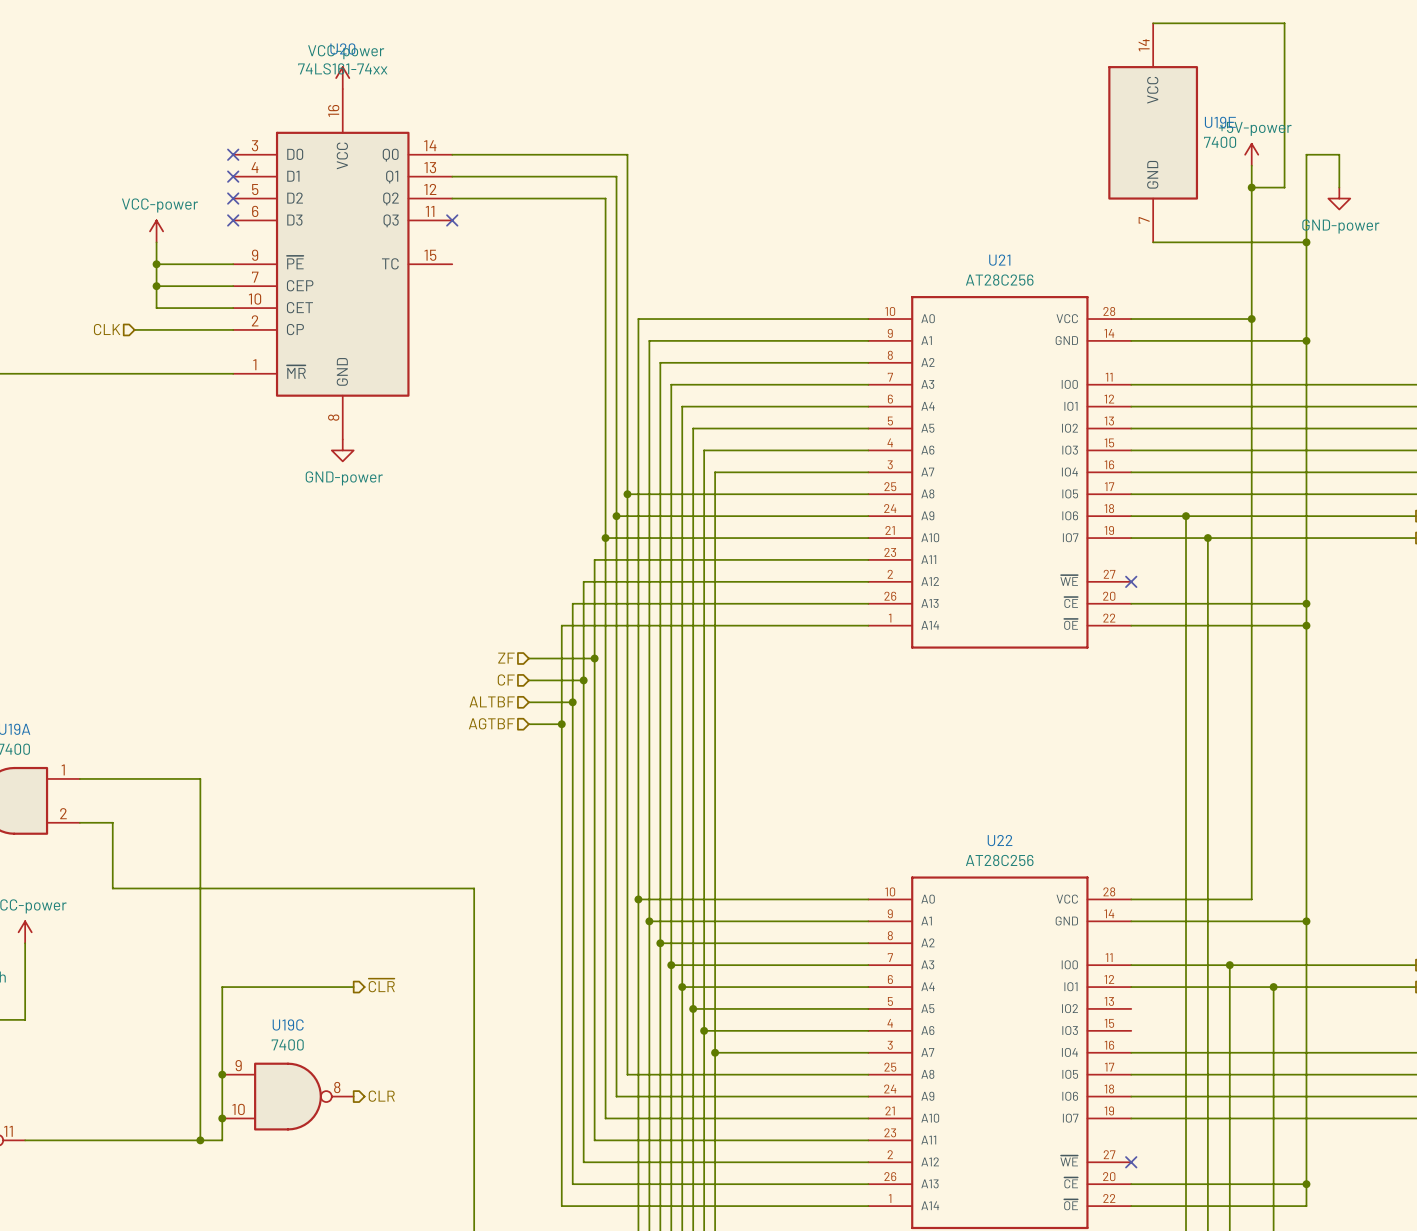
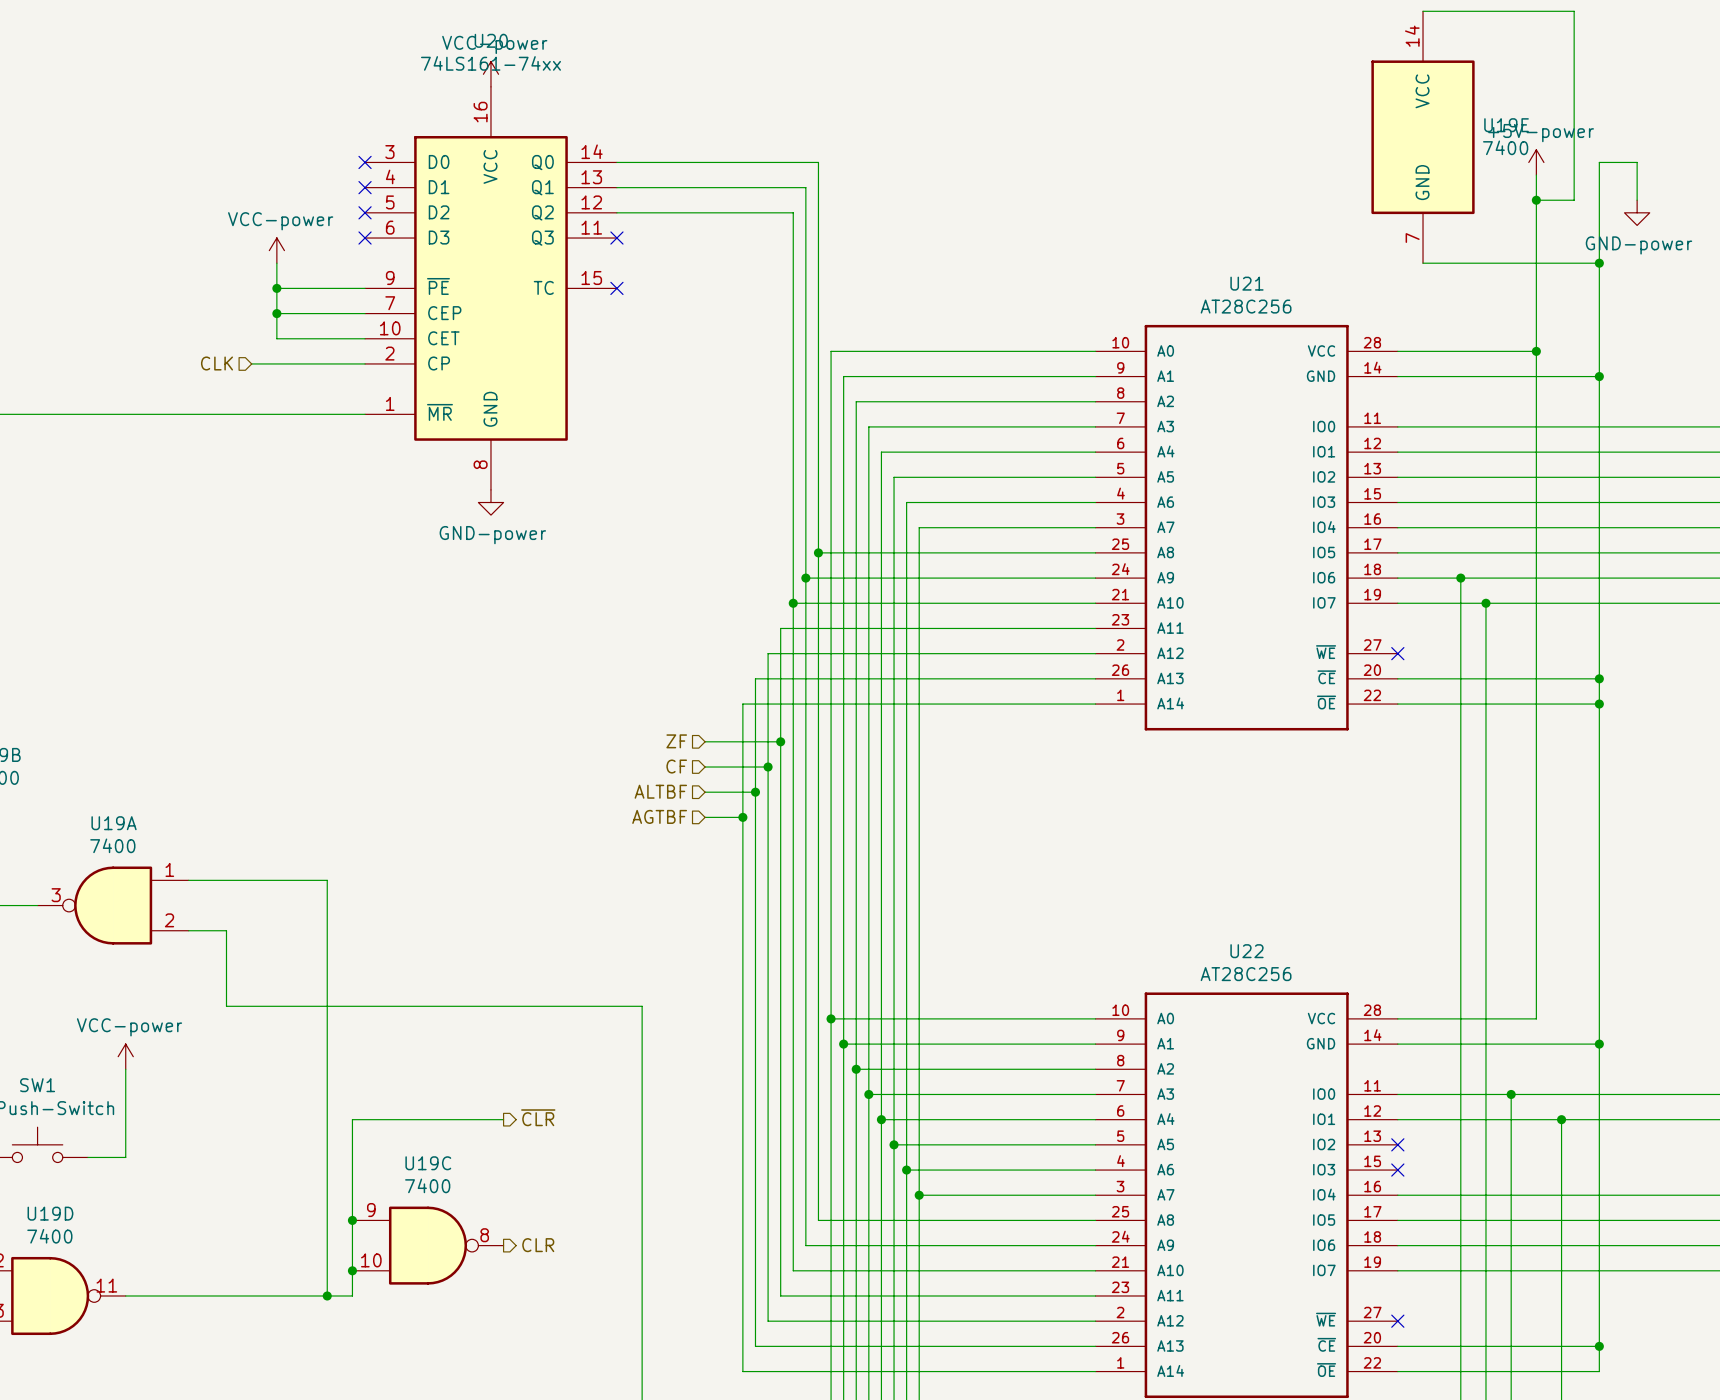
no-connect mark: none -> (616, 288)
no-connect mark: none -> (1397, 1144)
no-connect mark: none -> (1397, 1170)

